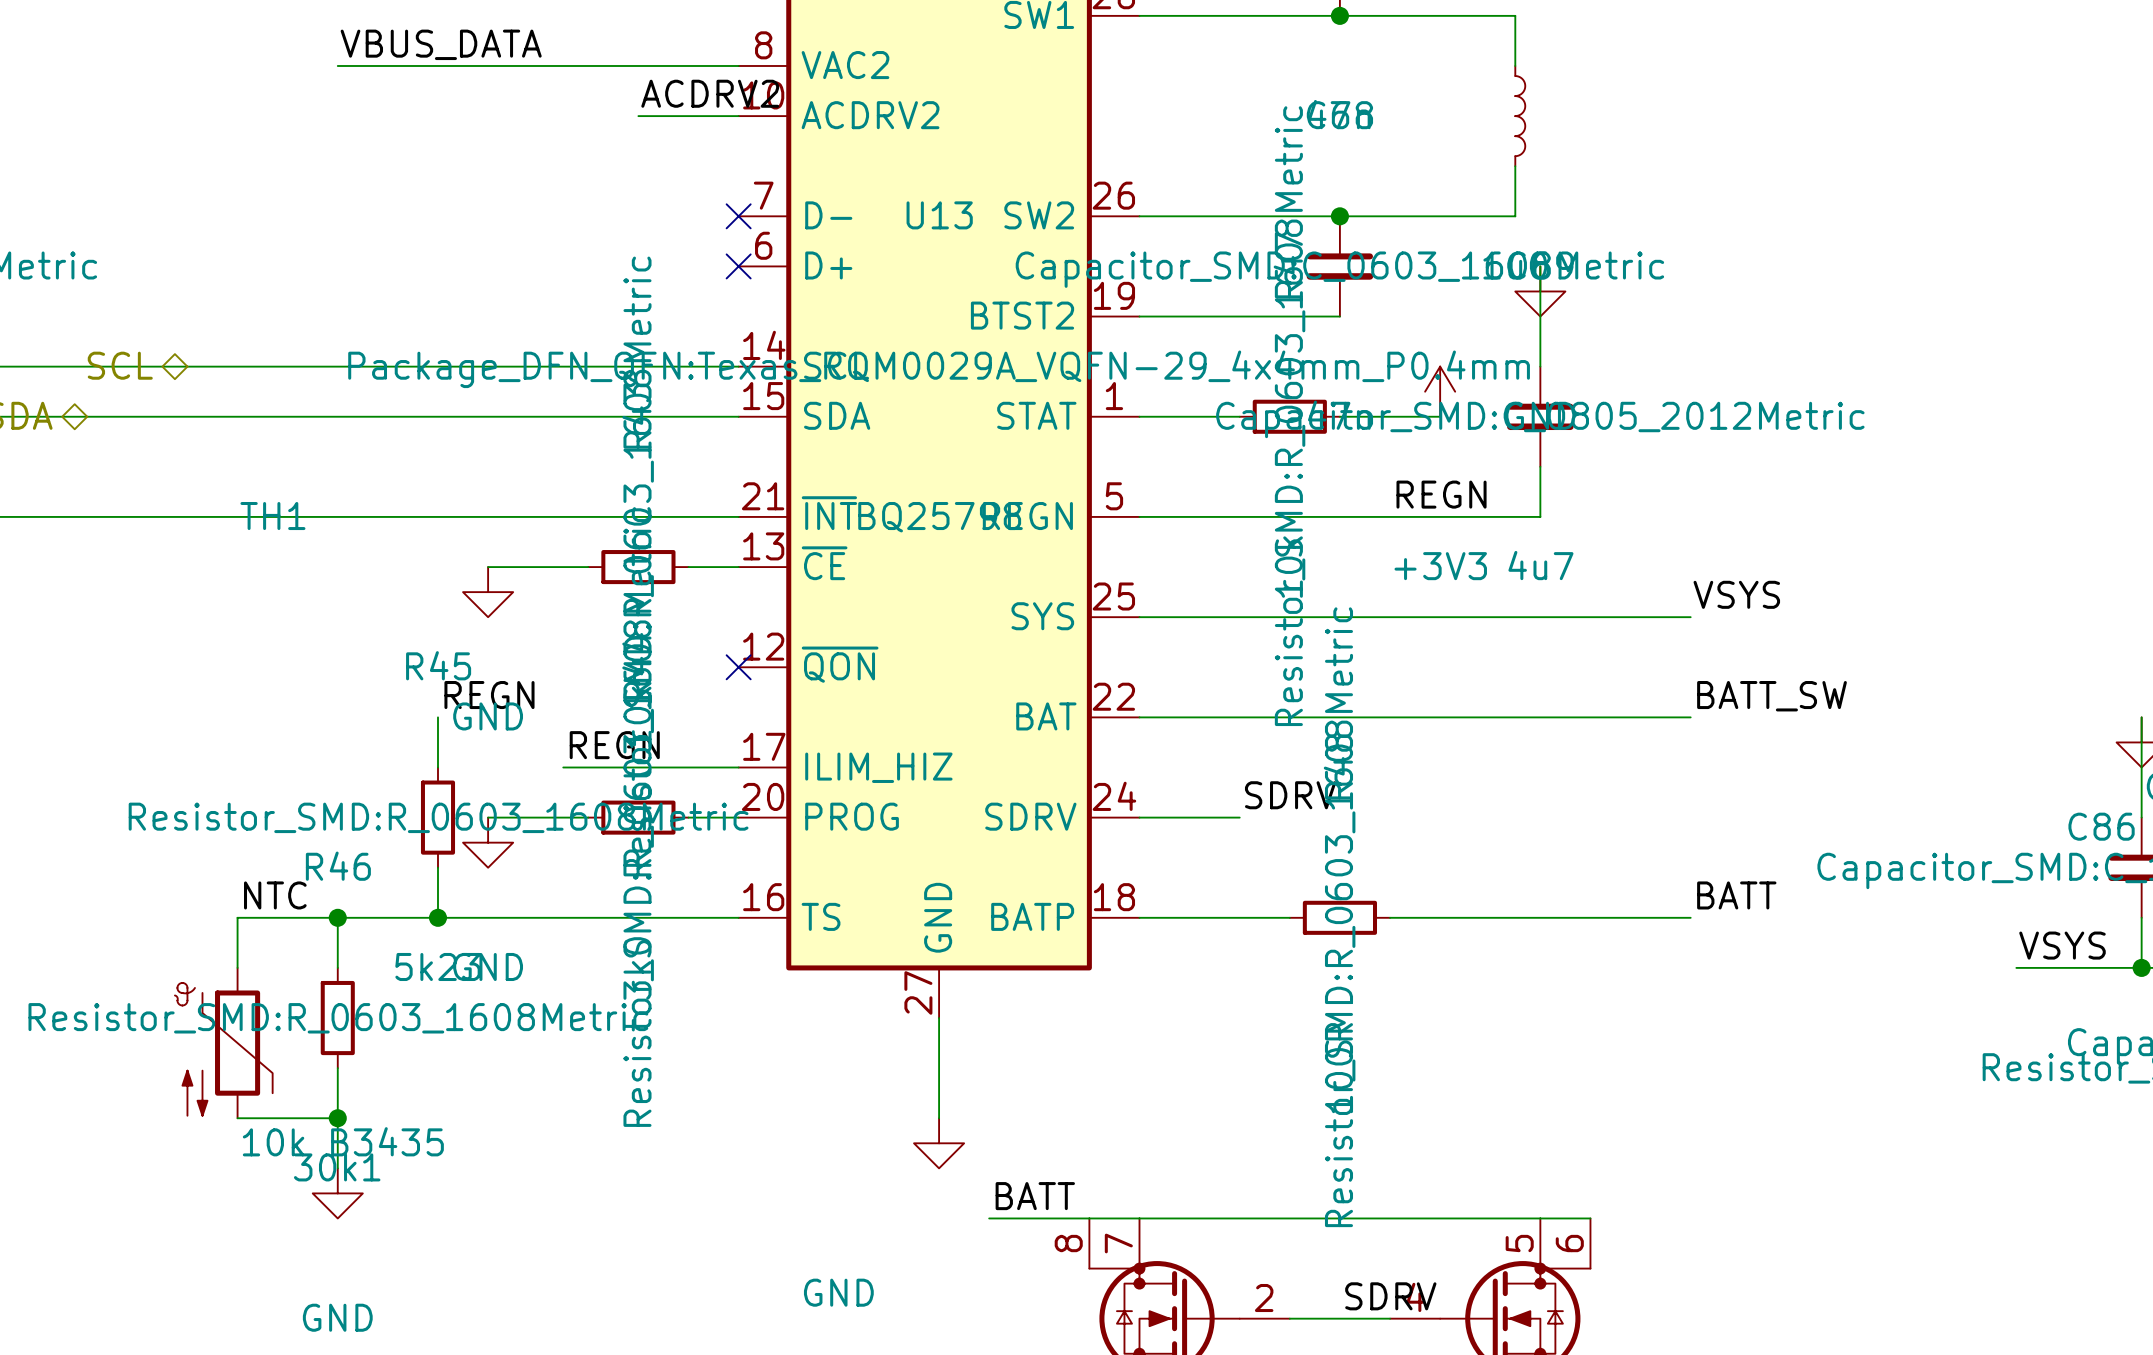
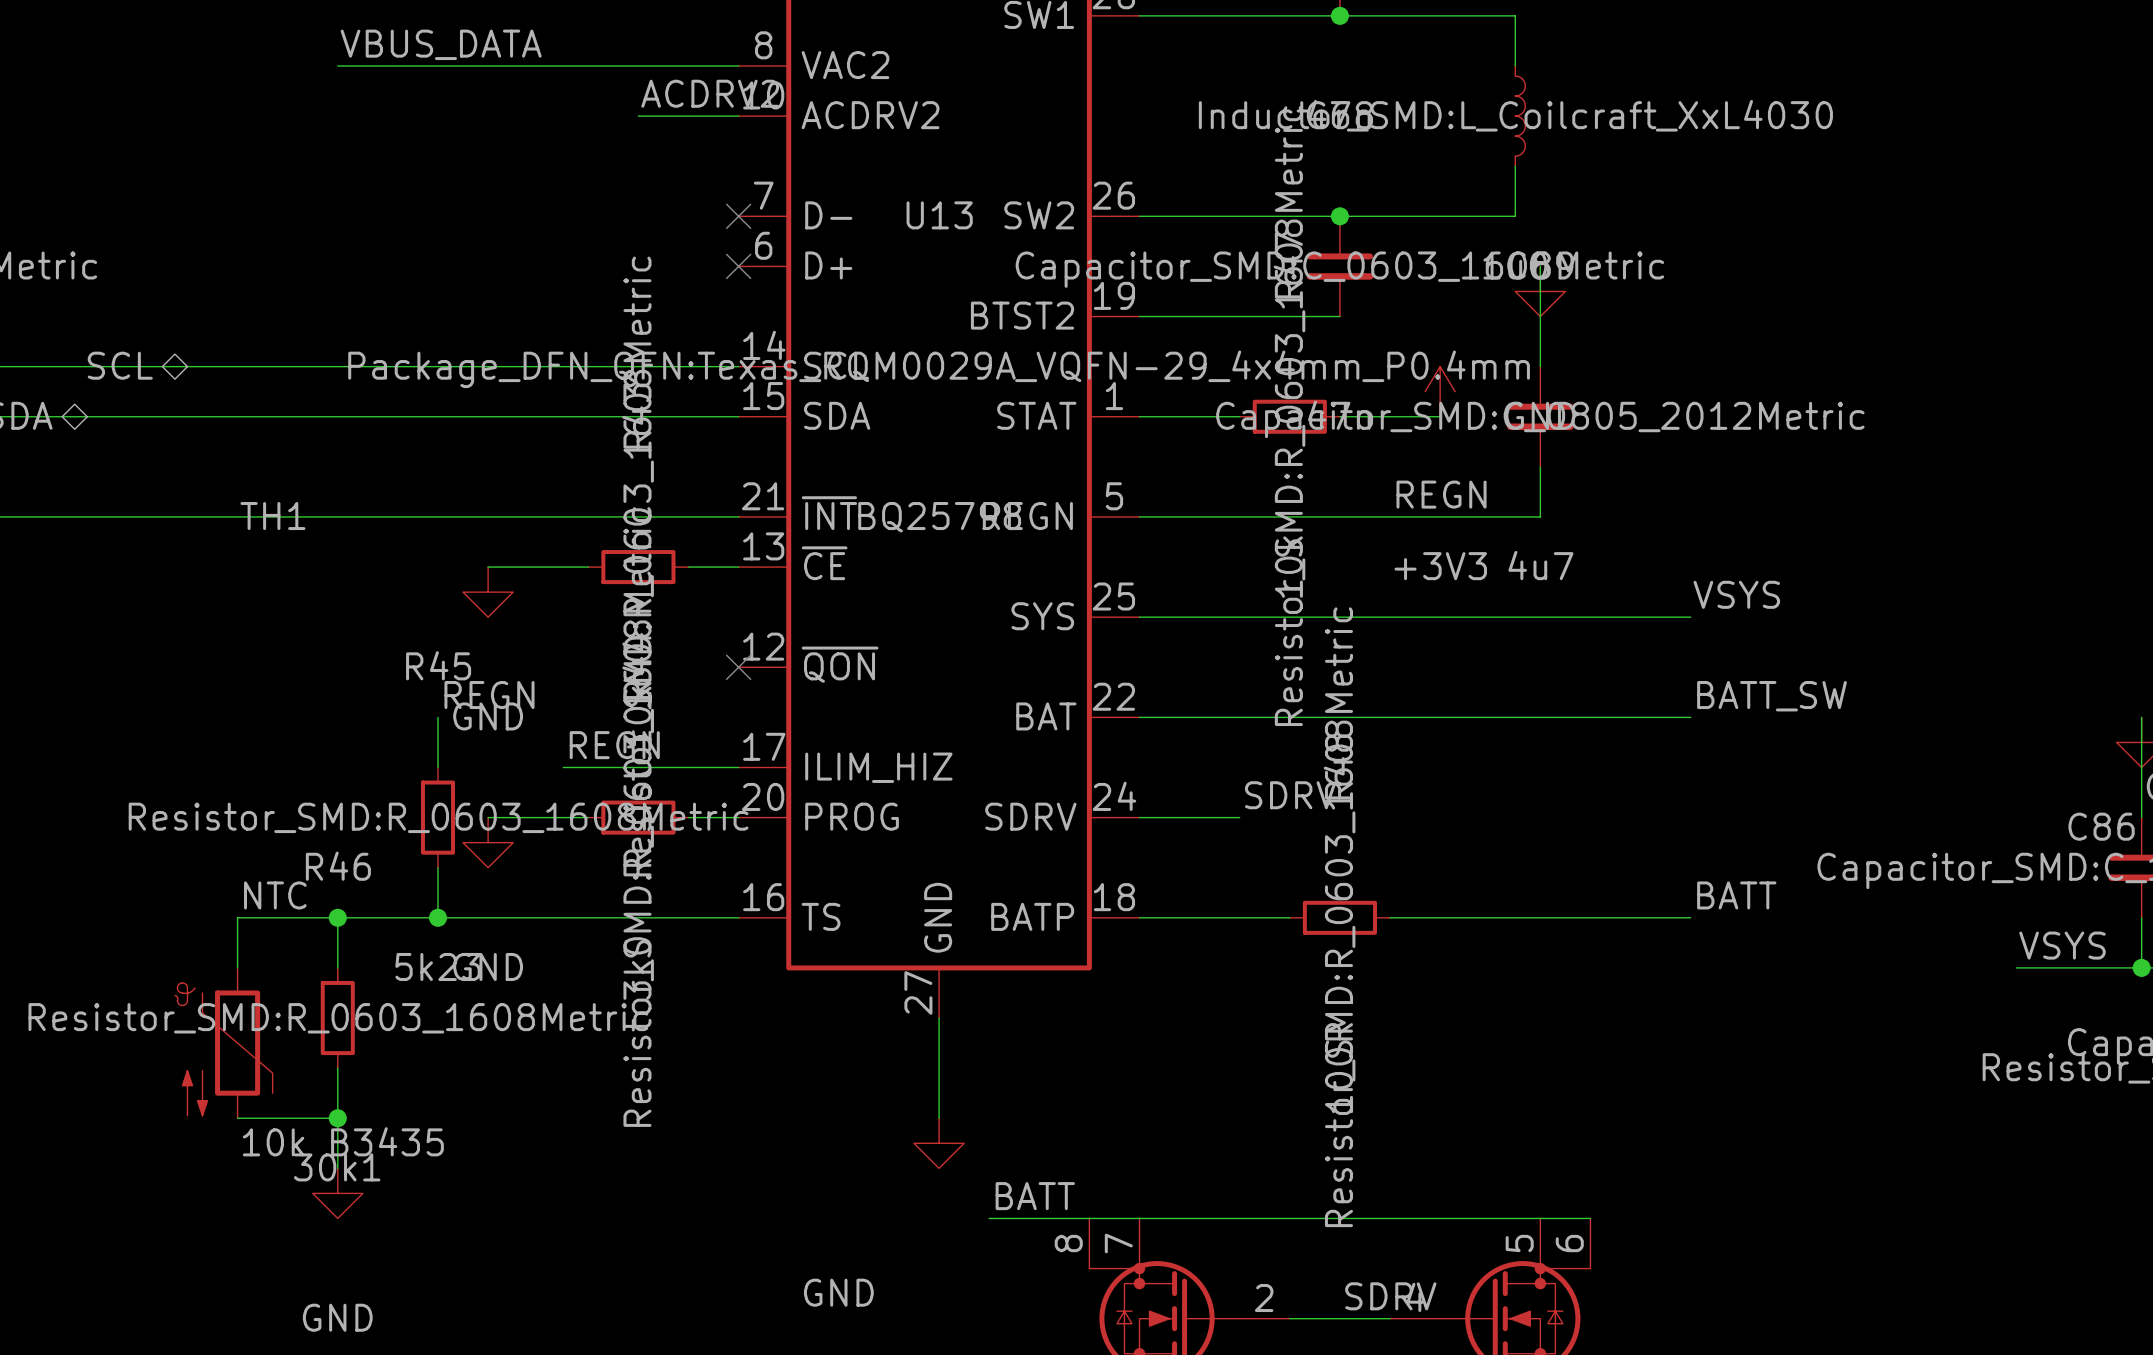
part text: none -> Inductor_SMD:L_Coilcraft_XxL4030 (1515, 115)

